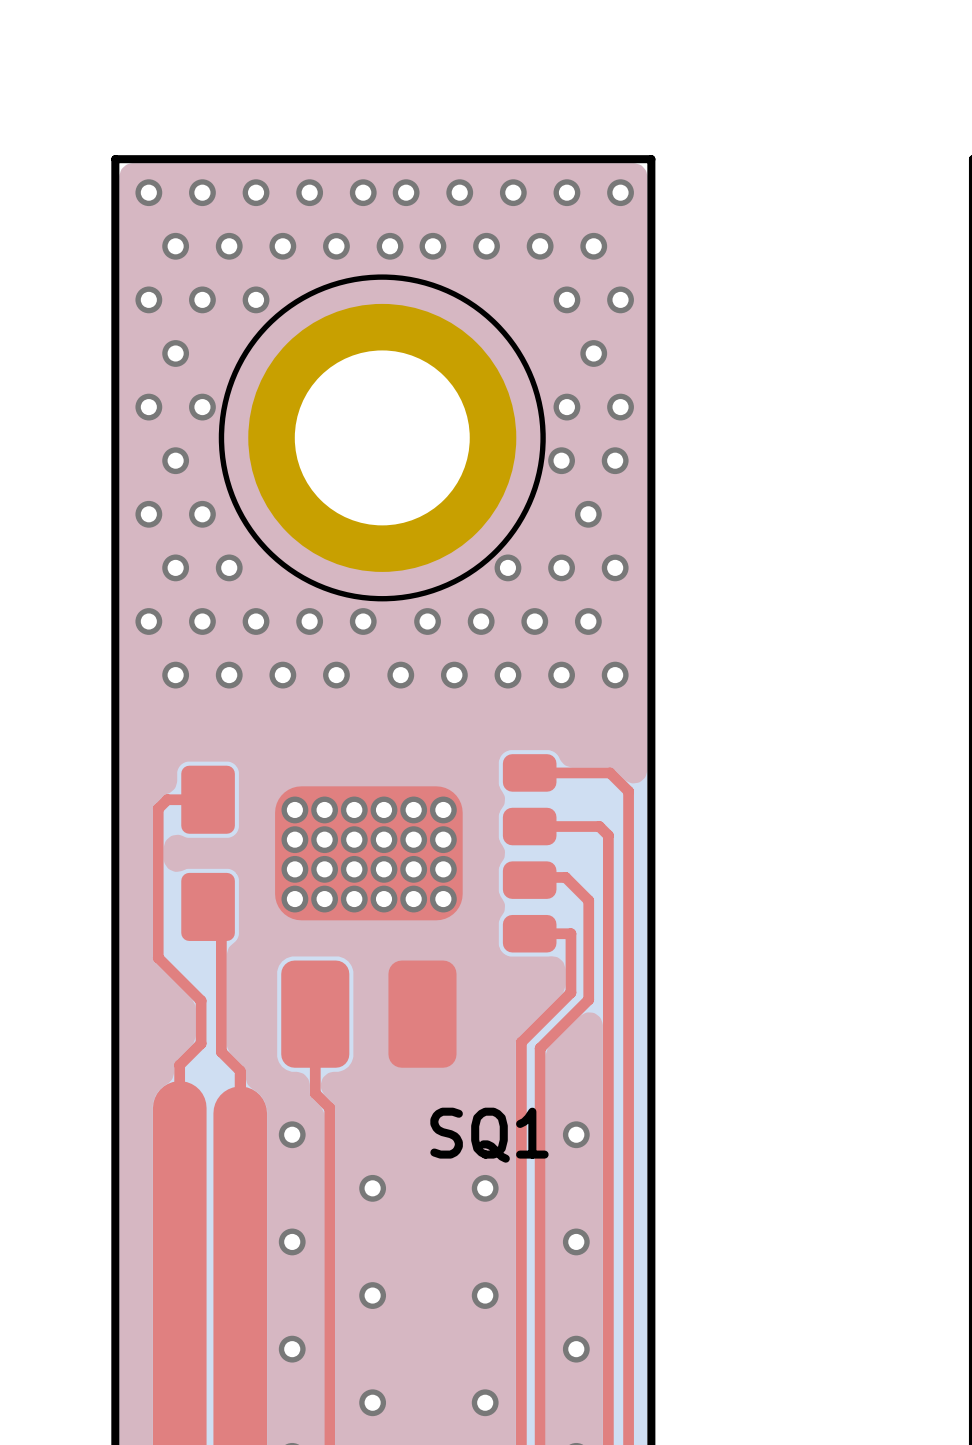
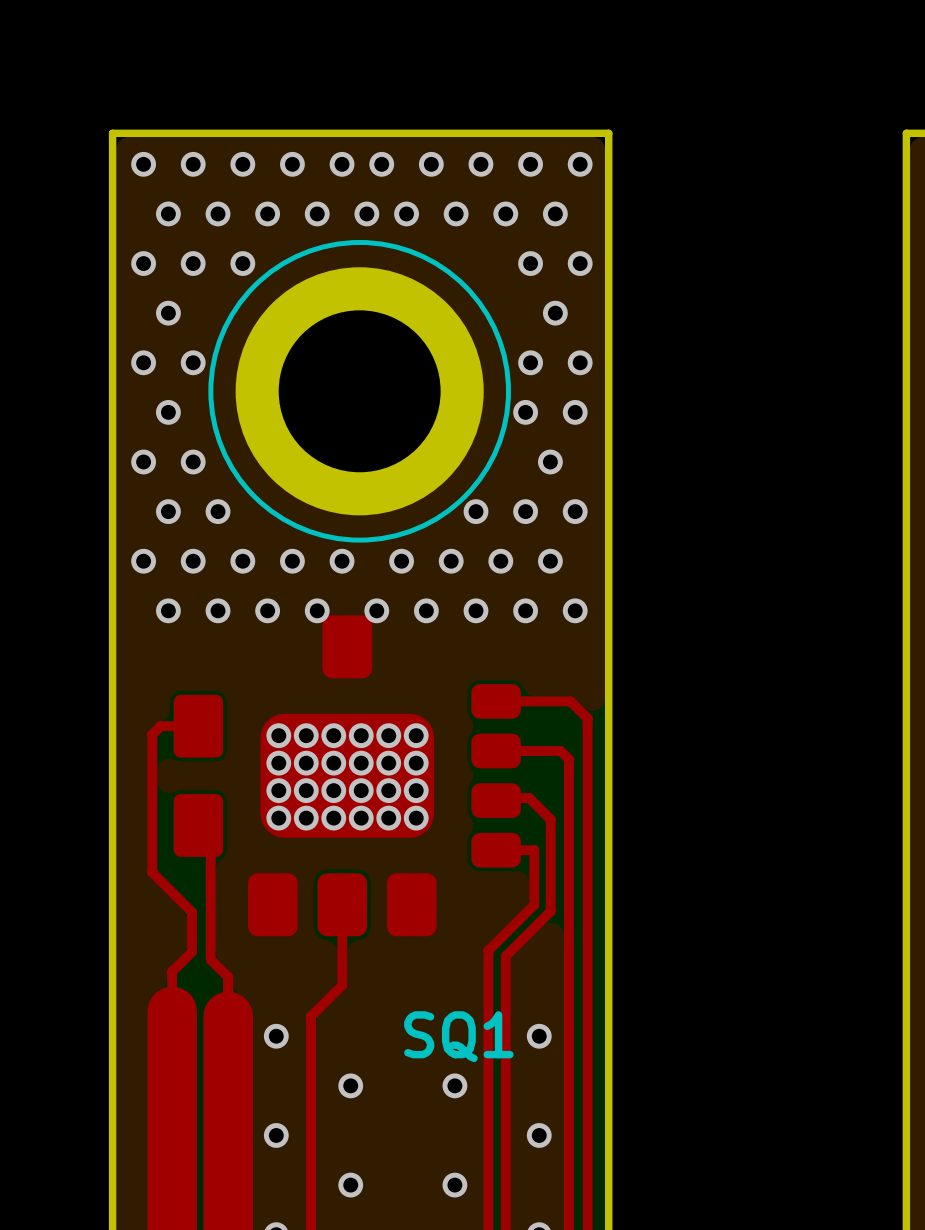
SQ1 footprint: [181, 754, 557, 1068] -> [173, 615, 521, 937]
top track: (315, 1014) (315, 1093) (329, 1107) (329, 1113) -> (342, 904) (342, 985) (311, 1016)

